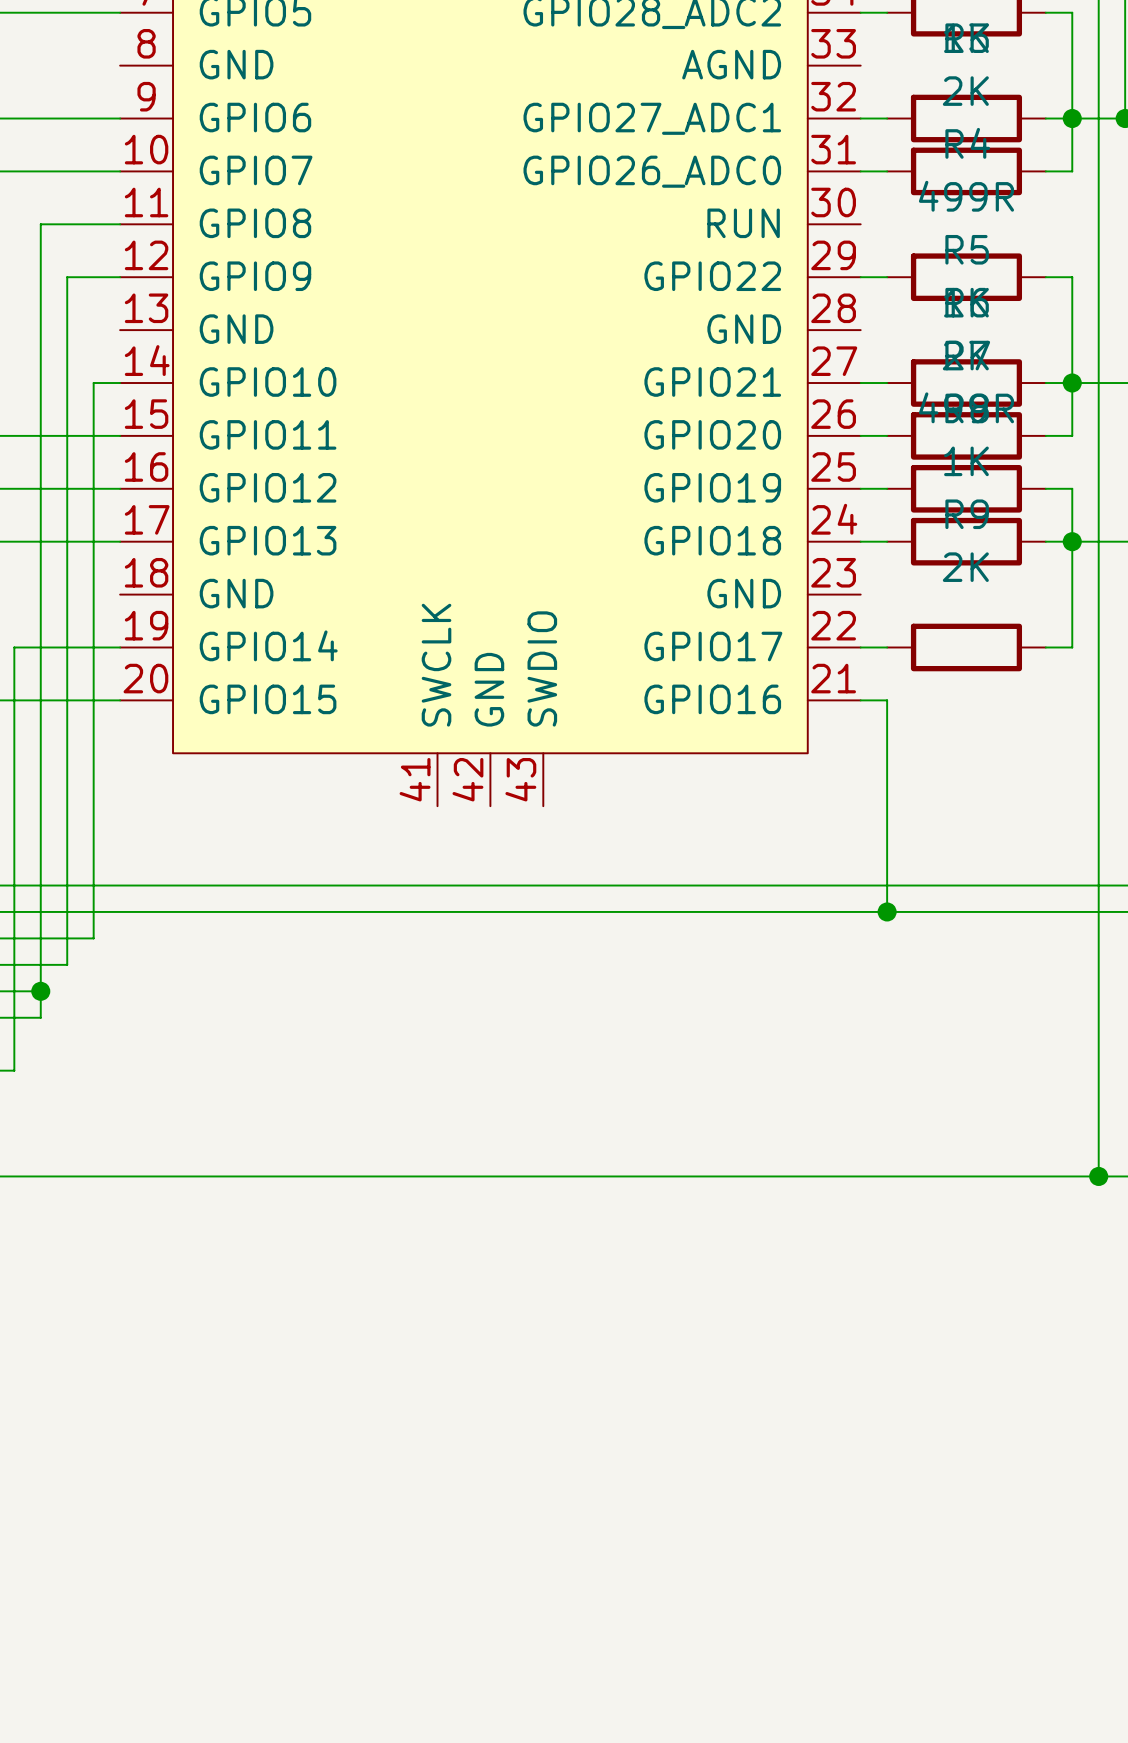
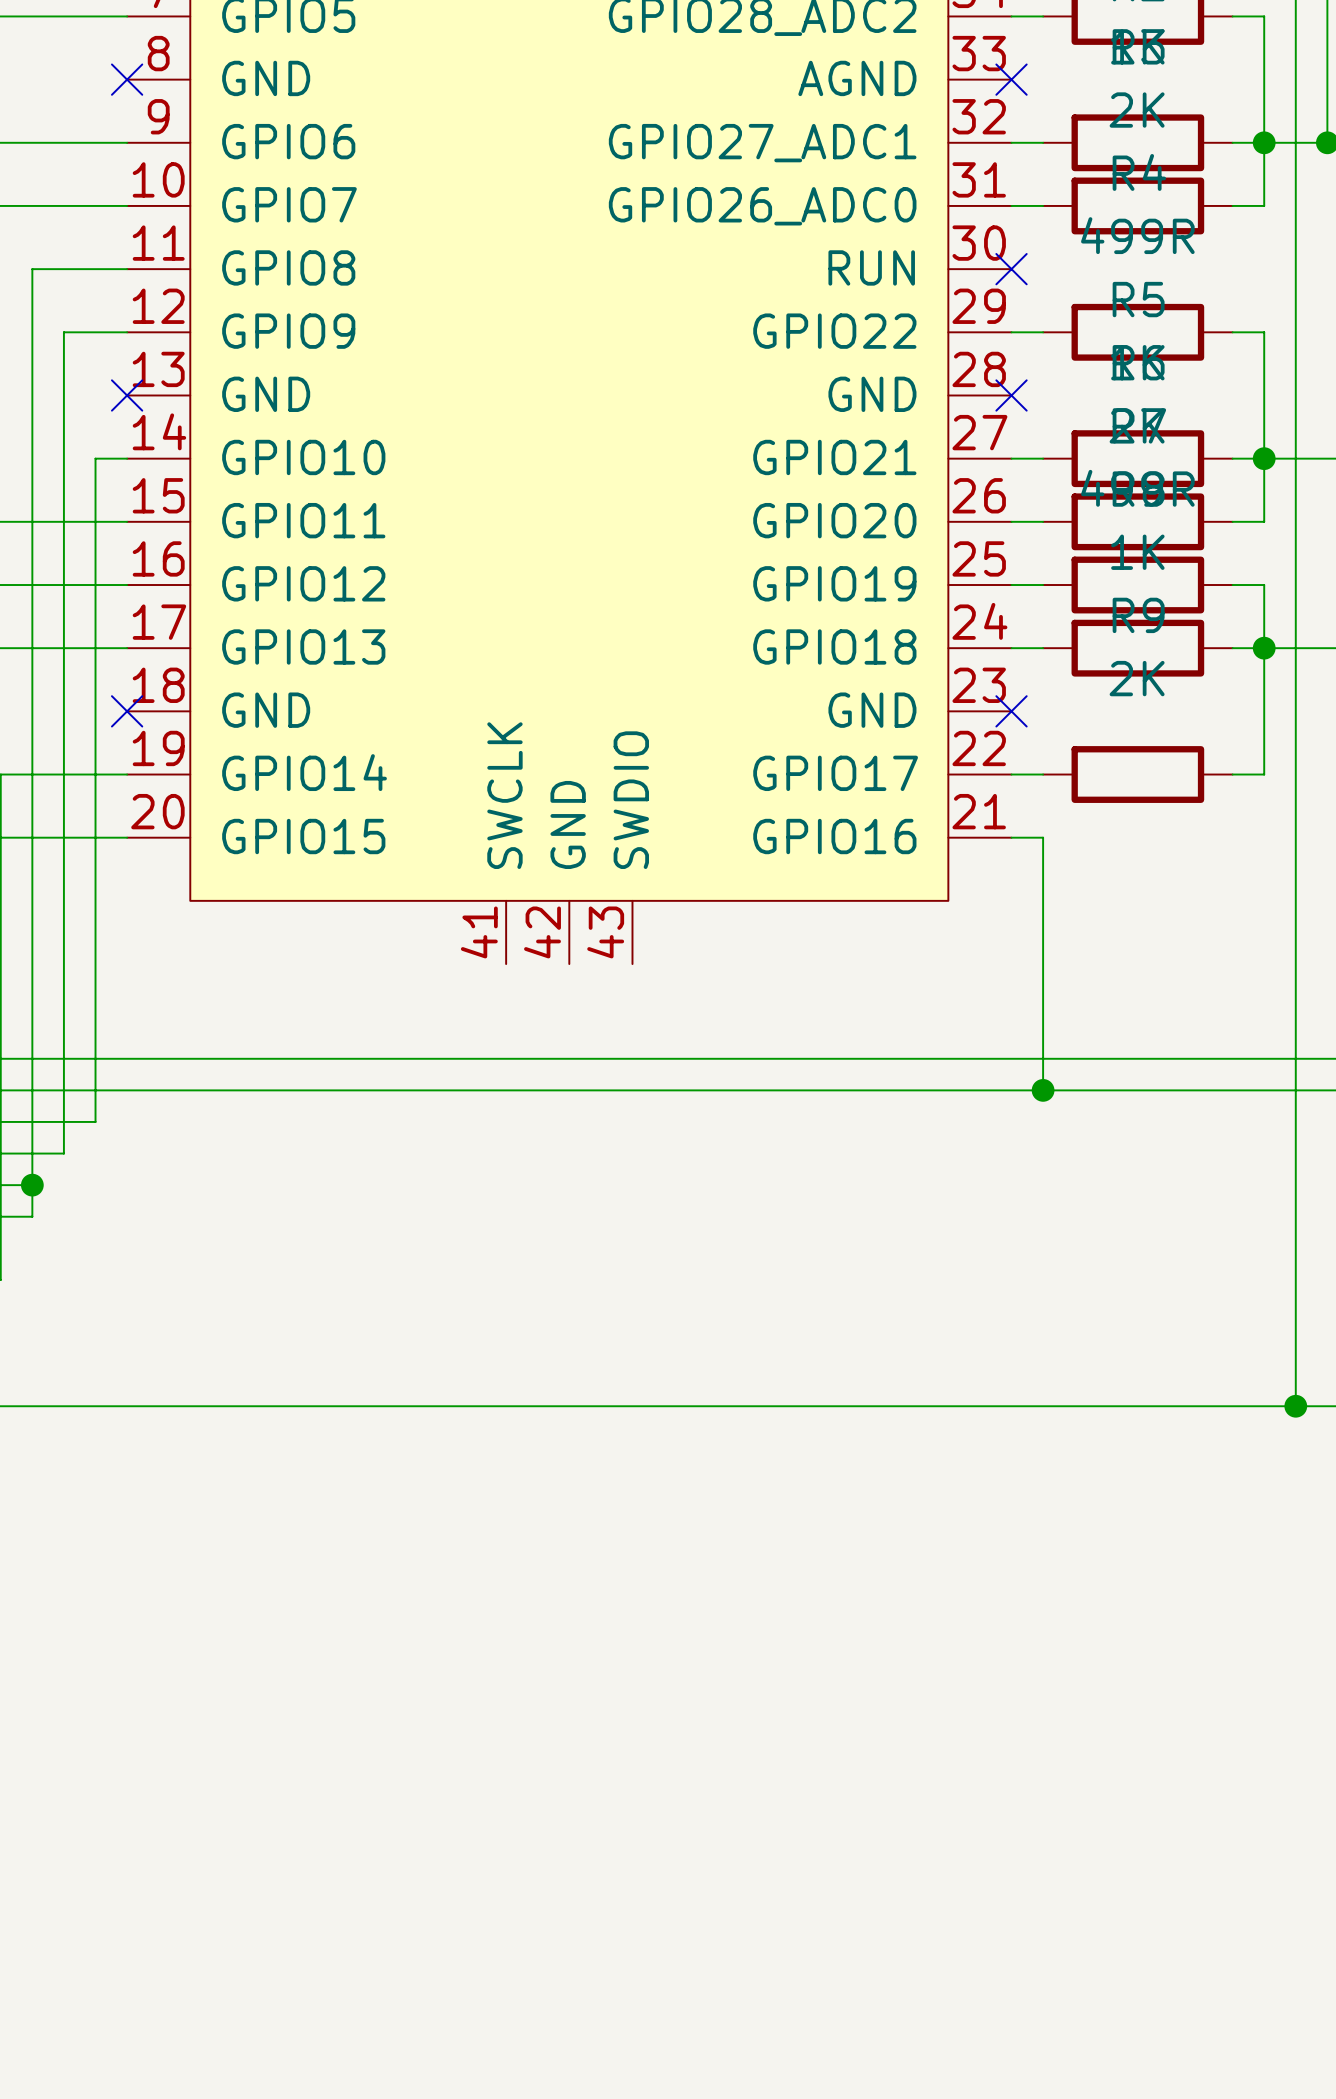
no-connect mark: none -> (127, 79)
no-connect mark: none -> (1011, 79)
no-connect mark: none -> (1011, 269)
no-connect mark: none -> (127, 395)
no-connect mark: none -> (1011, 395)
no-connect mark: none -> (127, 711)
no-connect mark: none -> (1011, 711)

